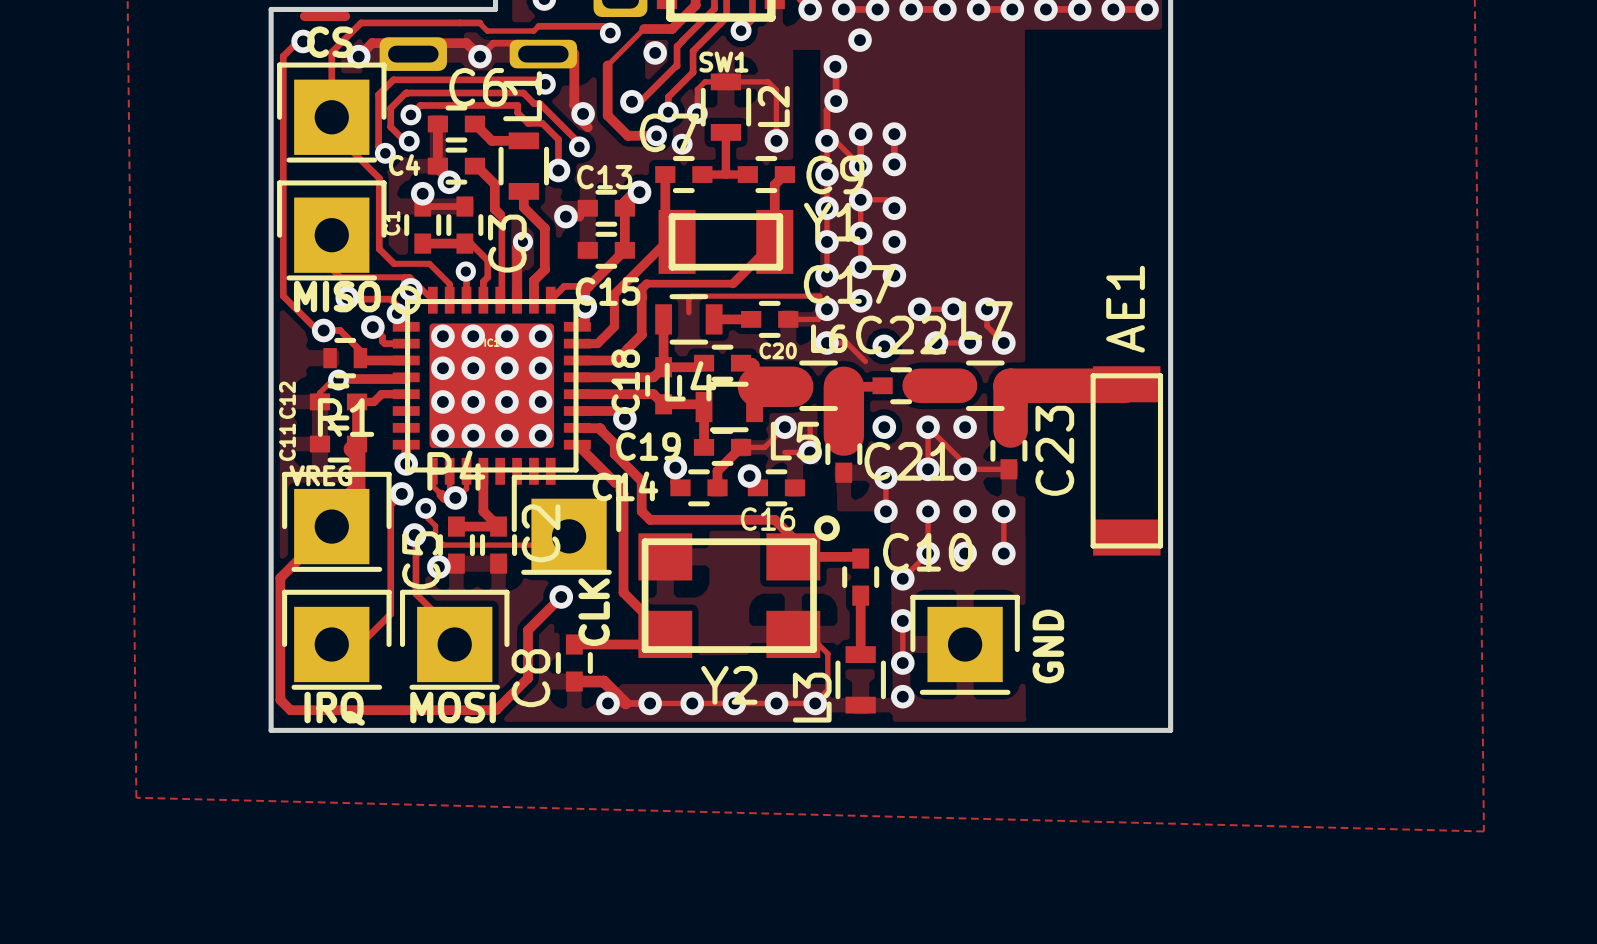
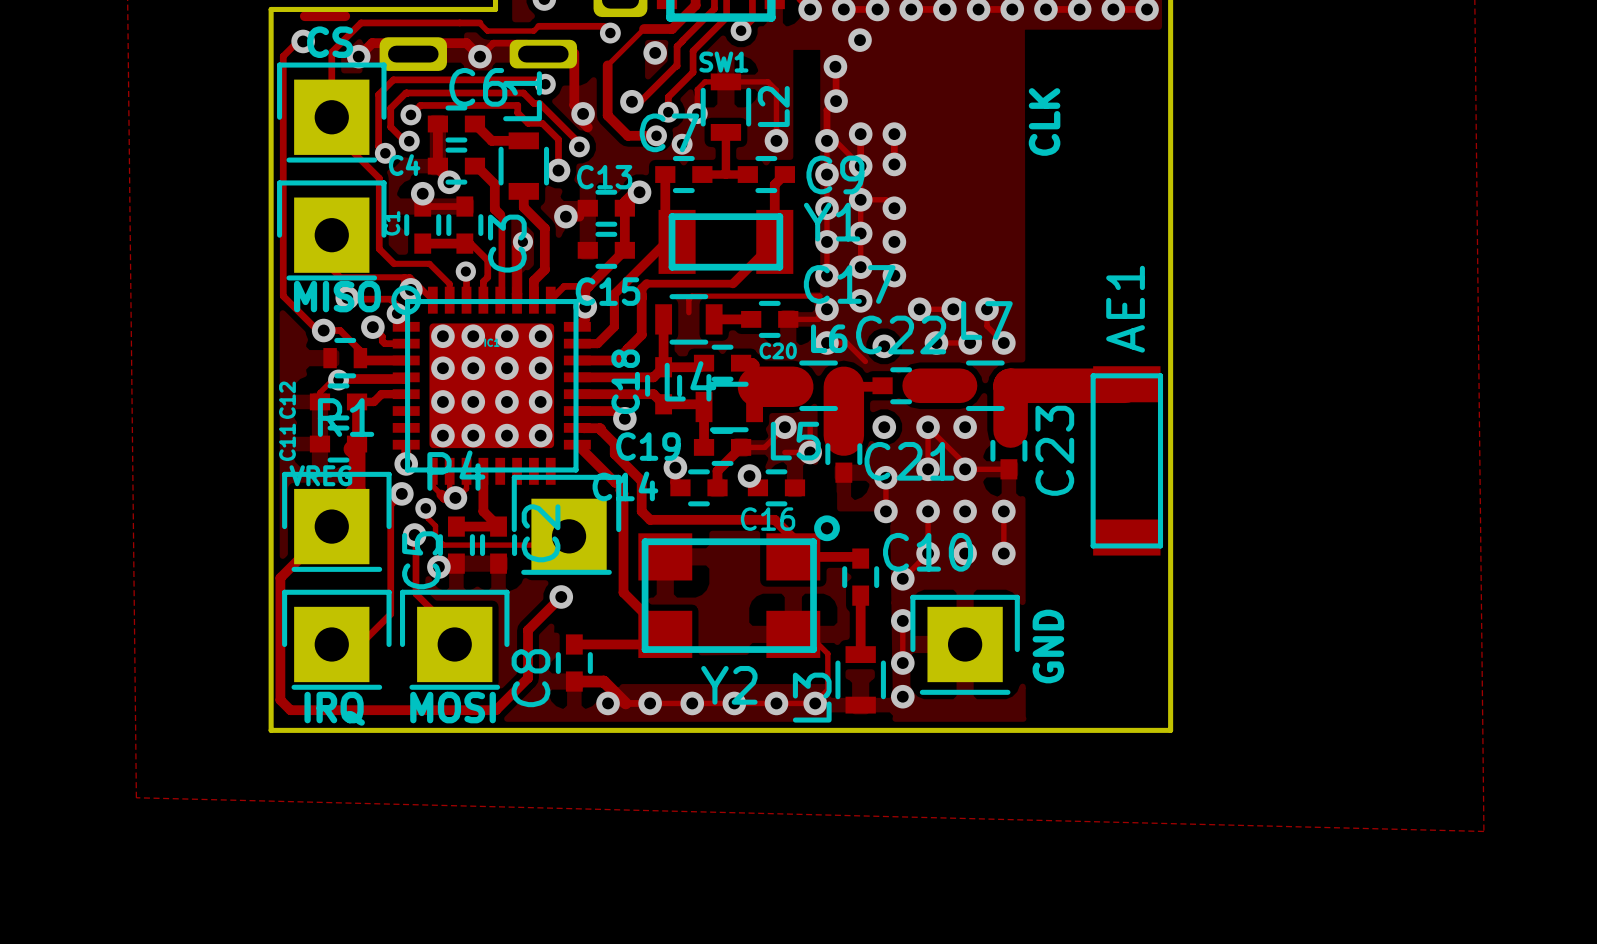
text position: CLK (594, 612) -> CLK (1044, 121)

